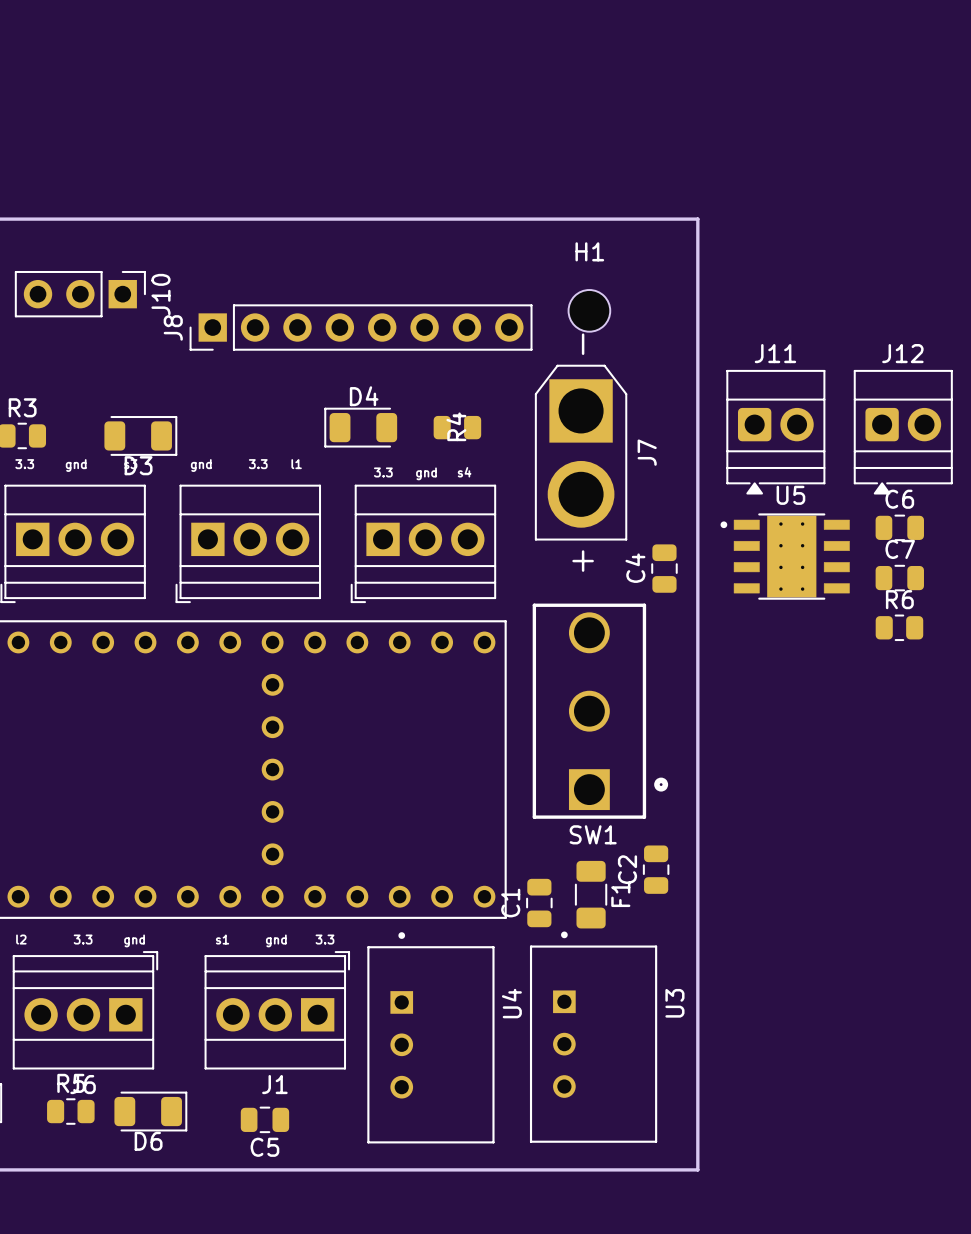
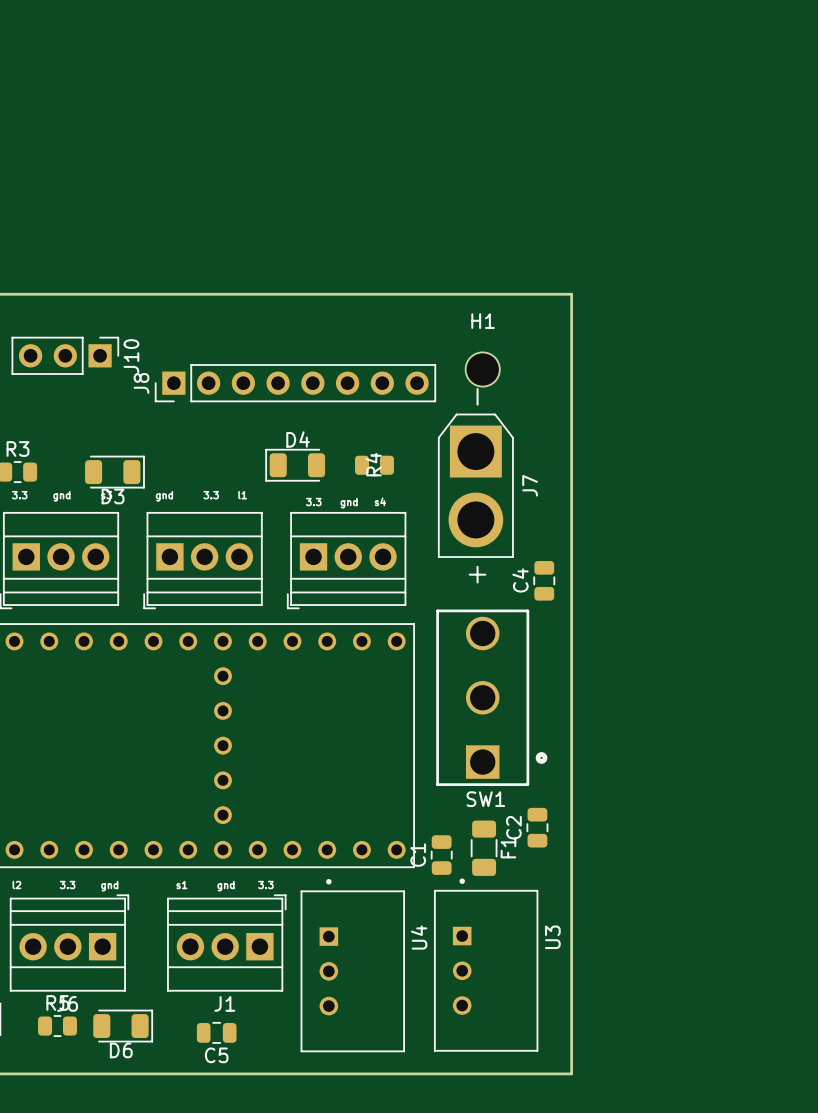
J11: (775, 432) -> none
J12: (903, 432) -> none
C6: (899, 527) -> none
U5: (785, 556) -> none
C7: (899, 578) -> none
R6: (899, 627) -> none

